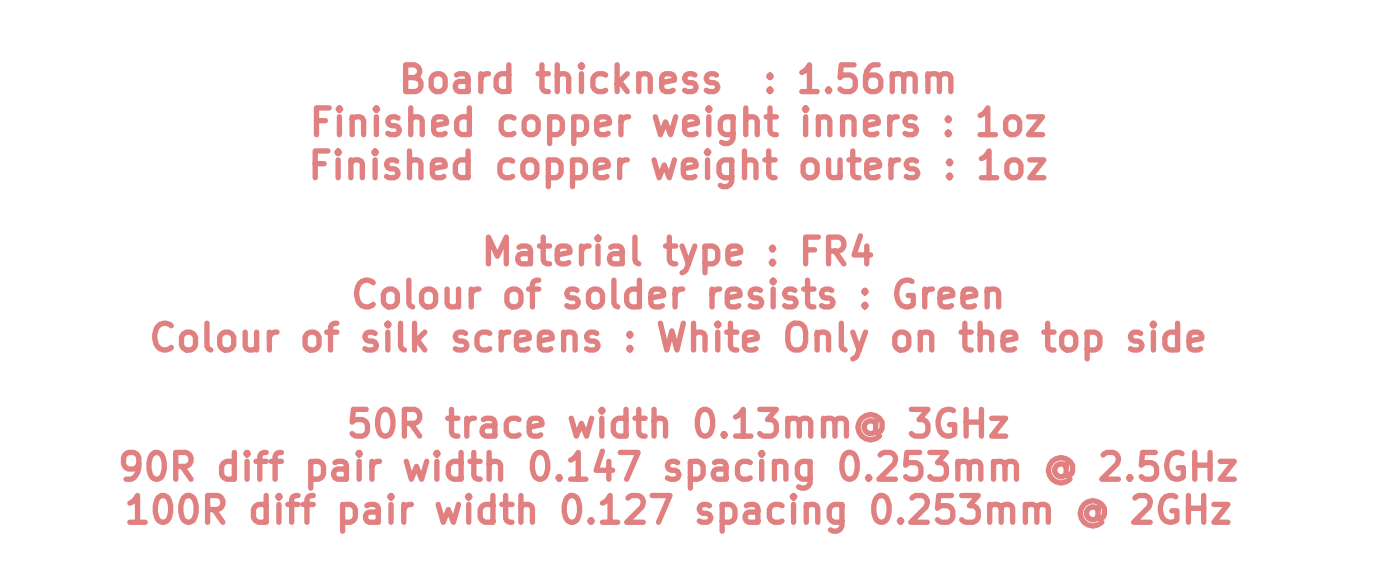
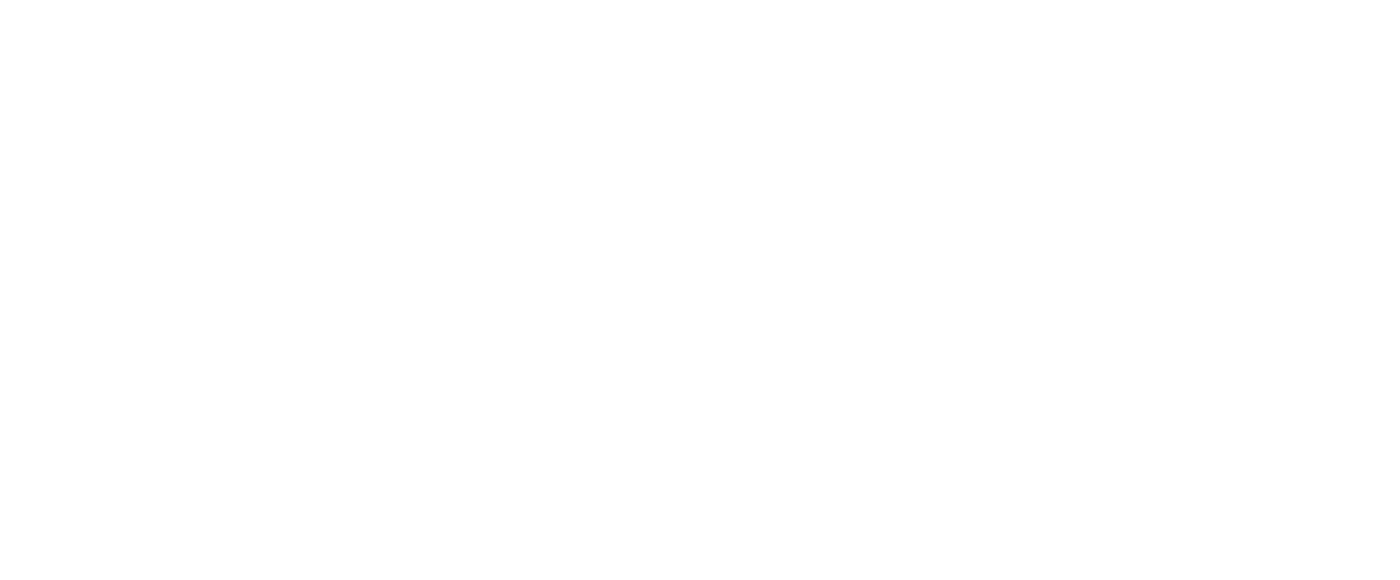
text: Board thickness : 1.56mm (678, 78) -> none
text: Finished copper weight inners : 1oz (679, 125) -> none
text: Finished copper weight outers : 1oz (679, 168) -> none
text: Material type : FR4 (679, 254) -> none
text: Colour of solder resists : Green (677, 293) -> none
text: Colour of silk screens : White Only on the top side (678, 341) -> none
text: 50R trace width 0.13mm@ 3GHz (678, 424) -> none
text: 90R diff pair width 0.147 spacing 0.253mm @ 2.5GHz (678, 469) -> none
text: 100R diff pair width 0.127 spacing 0.253mm @ 2GHz (678, 513) -> none

